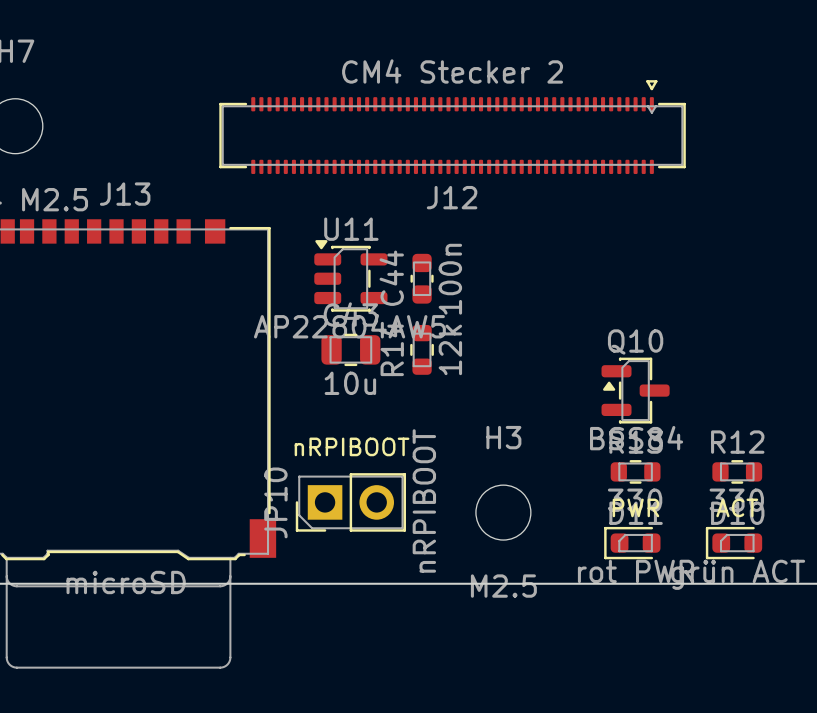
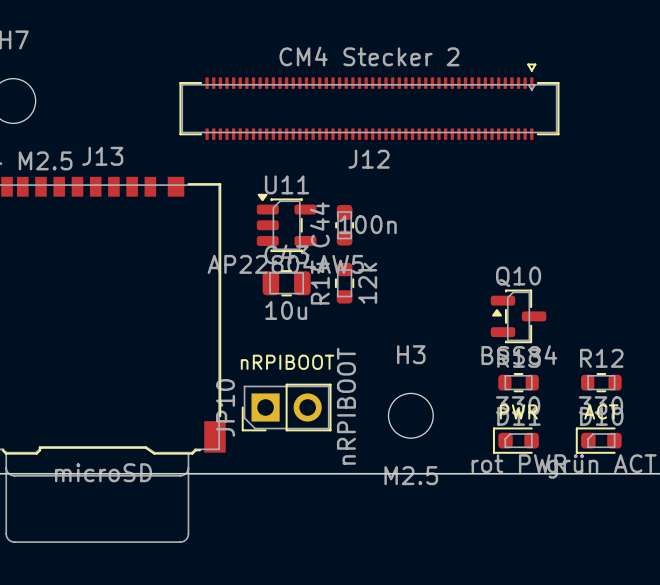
C44 value rotation: 0° (450, 279) -> 90° clockwise (367, 224)

